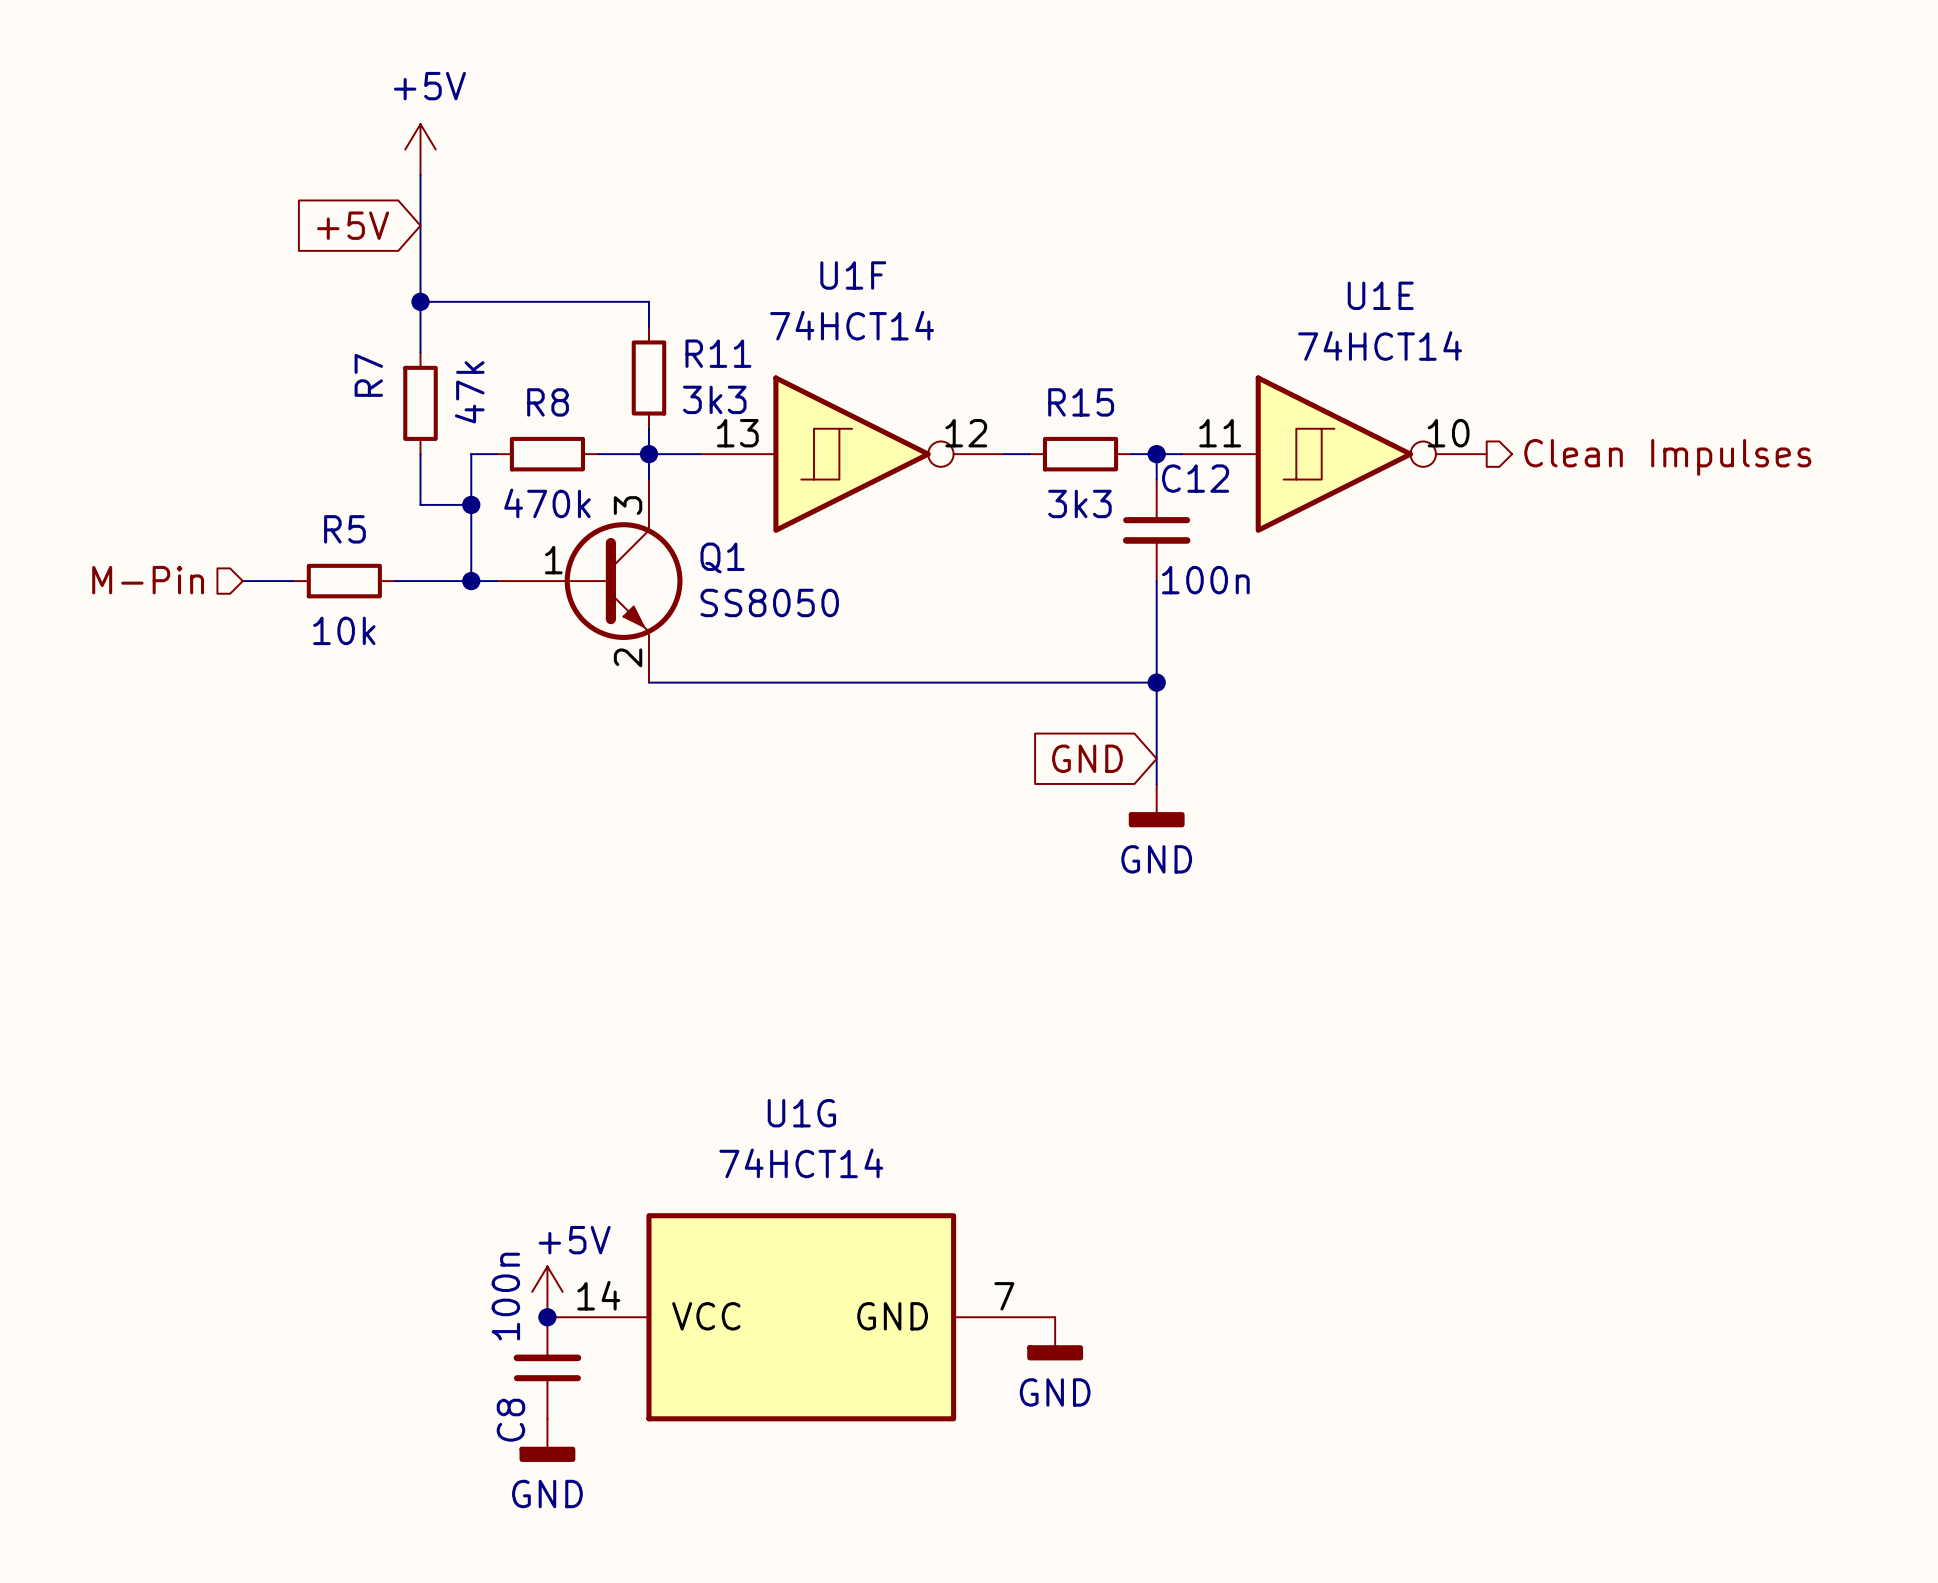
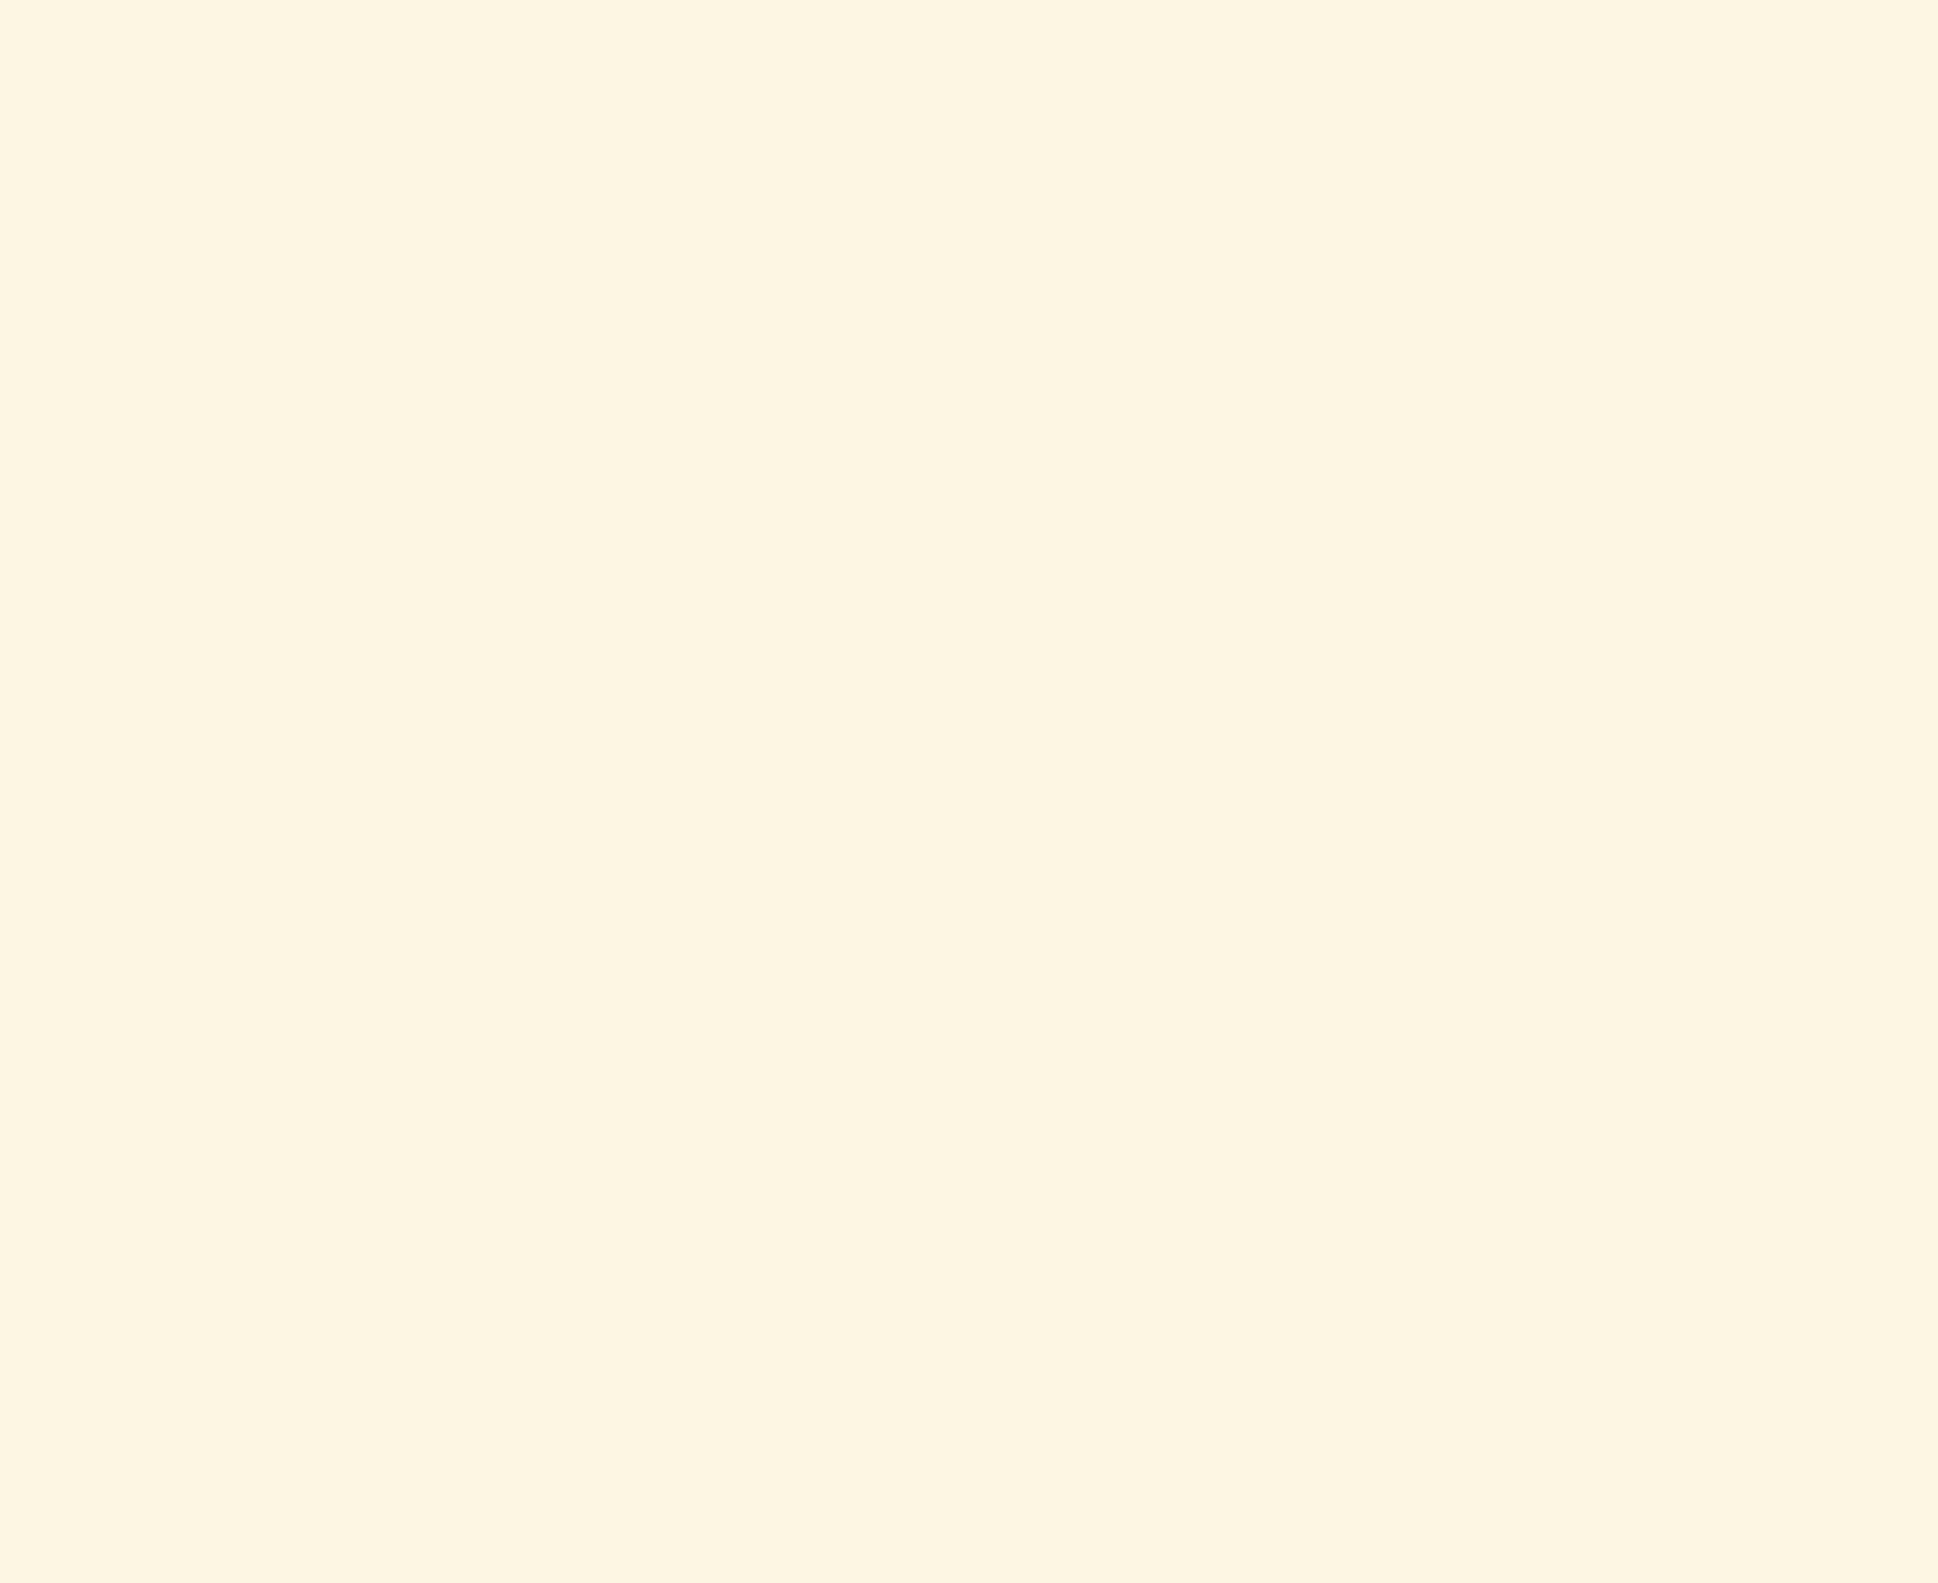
power symbol: +5V (420, 149) -> none
wire: (420, 174) (420, 352) -> none
global label: +5V (353, 225) -> none
wire: (420, 301) (648, 301) (648, 327) -> none
junction: (420, 301) -> none
R11: 3k3 (648, 377) -> none
R7: 47k (420, 403) -> none
wire: (648, 428) (648, 479) -> none
wire: (420, 454) (420, 504) (471, 504) -> none
wire: (496, 454) (471, 454) (471, 581) -> none
R8: 470k (547, 454) -> none
wire: (598, 454) (699, 454) -> none
junction: (648, 454) -> none
U1F: 74HCT14 (852, 454) -> none
wire: (1004, 454) (1029, 454) -> none
R15: 3k3 (1080, 454) -> none
wire: (1131, 454) (1182, 454) -> none
wire: (1156, 454) (1156, 479) -> none
junction: (1156, 454) -> none
U1E: 74HCT14 (1334, 454) -> none
hierarchical label: Clean Impulses (1667, 457) -> none
junction: (471, 504) -> none
C12: 100n (1156, 530) -> none
hierarchical label: M-Pin (148, 580) -> none
wire: (242, 581) (293, 581) -> none
R5: 10k (344, 581) -> none
wire: (395, 581) (496, 581) -> none
junction: (471, 581) -> none
Q1: SS8050 (589, 581) -> none
wire: (1156, 581) (1156, 784) -> none
wire: (648, 682) (1156, 682) -> none
junction: (1156, 682) -> none
global label: GND (1087, 758) -> none
power symbol: GND (1156, 805) -> none
power symbol: +5V (547, 1291) -> none
junction: (547, 1317) -> none
U1G: 74HCT14 (801, 1317) -> none
power symbol: GND (1055, 1338) -> none
C8: 100n (547, 1368) -> none
power symbol: GND (547, 1440) -> none

